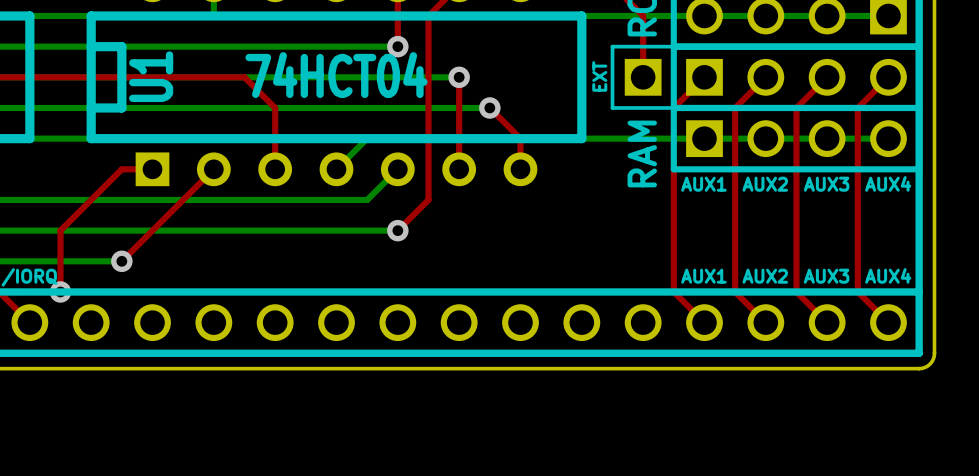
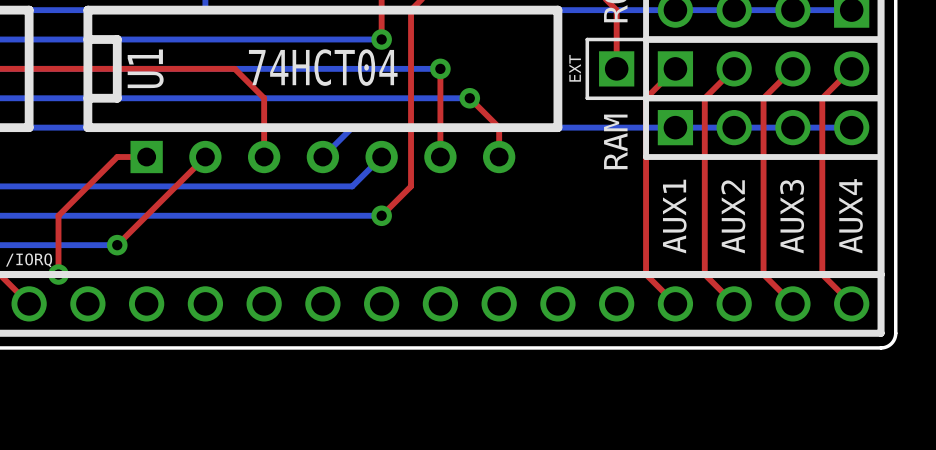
text: AUX4 (888, 183) -> none
text: AUX1 (703, 184) -> none
text: AUX2 (765, 184) -> none
text: AUX3 (826, 184) -> none
text: none -> AUX1 (674, 216)
text: none -> AUX2 (733, 216)
text: none -> AUX3 (792, 216)
text: none -> AUX4 (851, 216)
text: AUX4 (888, 275) -> none
text: AUX1 (703, 276) -> none
text: AUX2 (765, 276) -> none
text: AUX3 (826, 276) -> none

